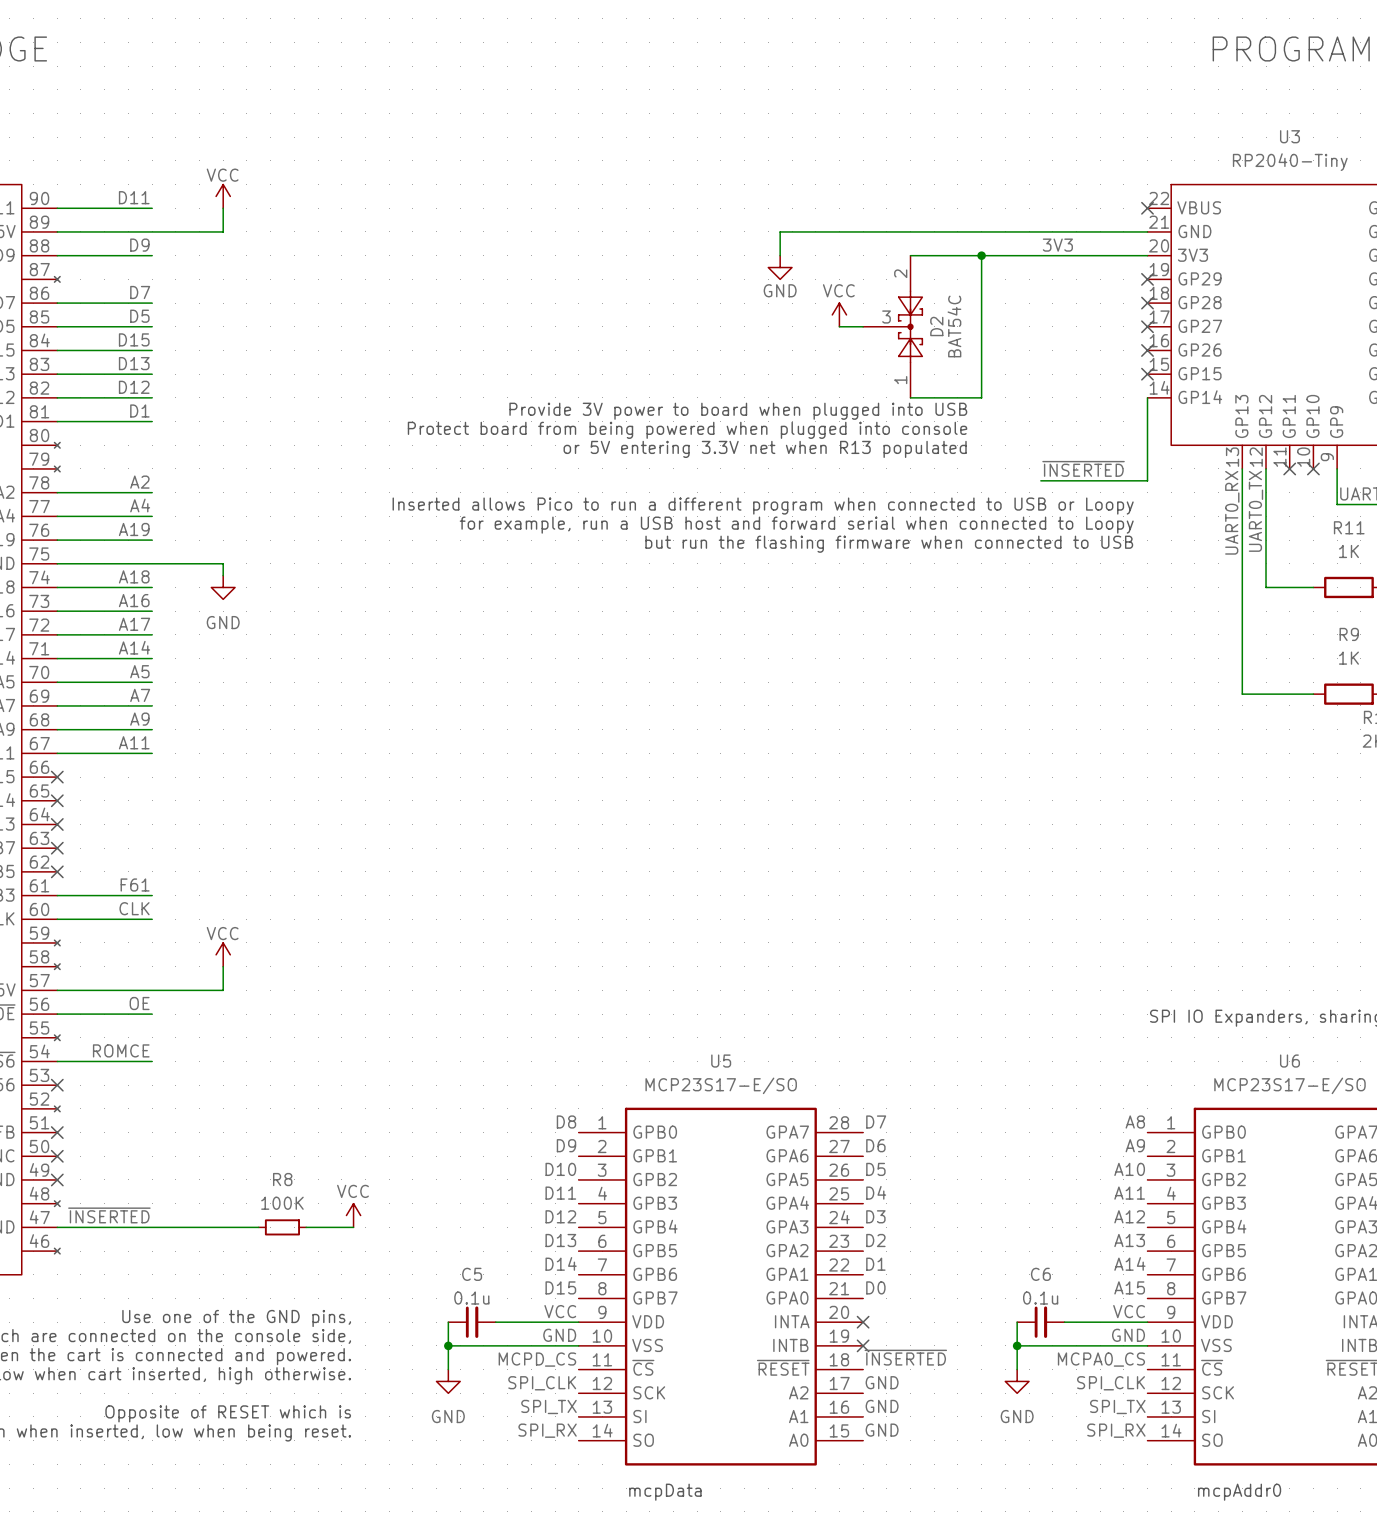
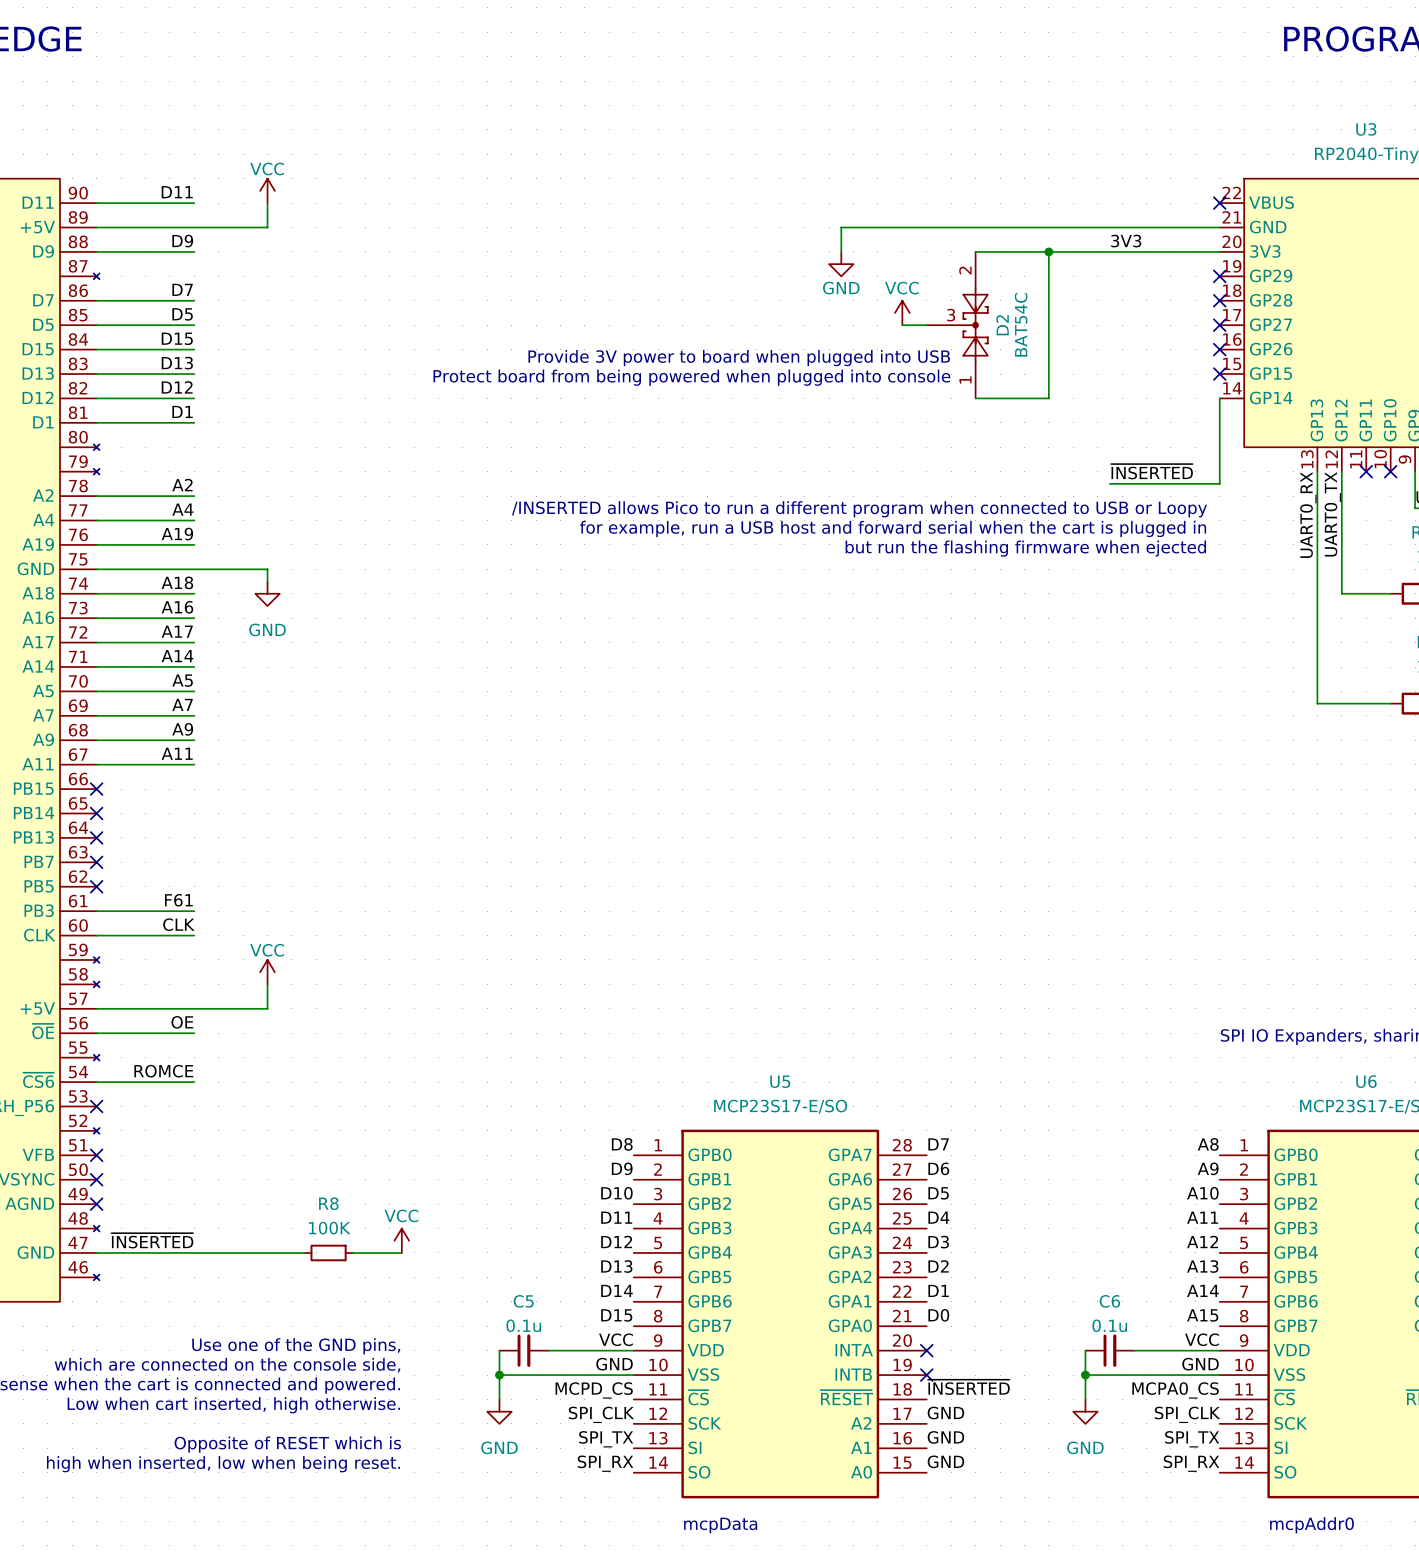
text position: Provide 3V power to board when plugged into USB (738, 411) -> Provide 3V power to board when plugged into USB (739, 358)
text position: Protect board from being powered when plugged into console (687, 430) -> Protect board from being powered when plugged into console (691, 377)
text: or 5V entering 3.3V net when R13 populated (765, 449) -> none
text: Inserted allows Pico to run a different program when connected to USB or Loopy (763, 506) -> /INSERTED allows Pico to run a different program when connected to USB or Loopy (859, 509)
text: for example, run a USB host and forward serial when connected to Loopy (796, 525) -> for example, run a USB host and forward serial when the cart is plugged in (893, 528)
text: but run the flashing firmware when connected to USB (889, 544) -> but run the flashing firmware when ejected (1025, 548)

